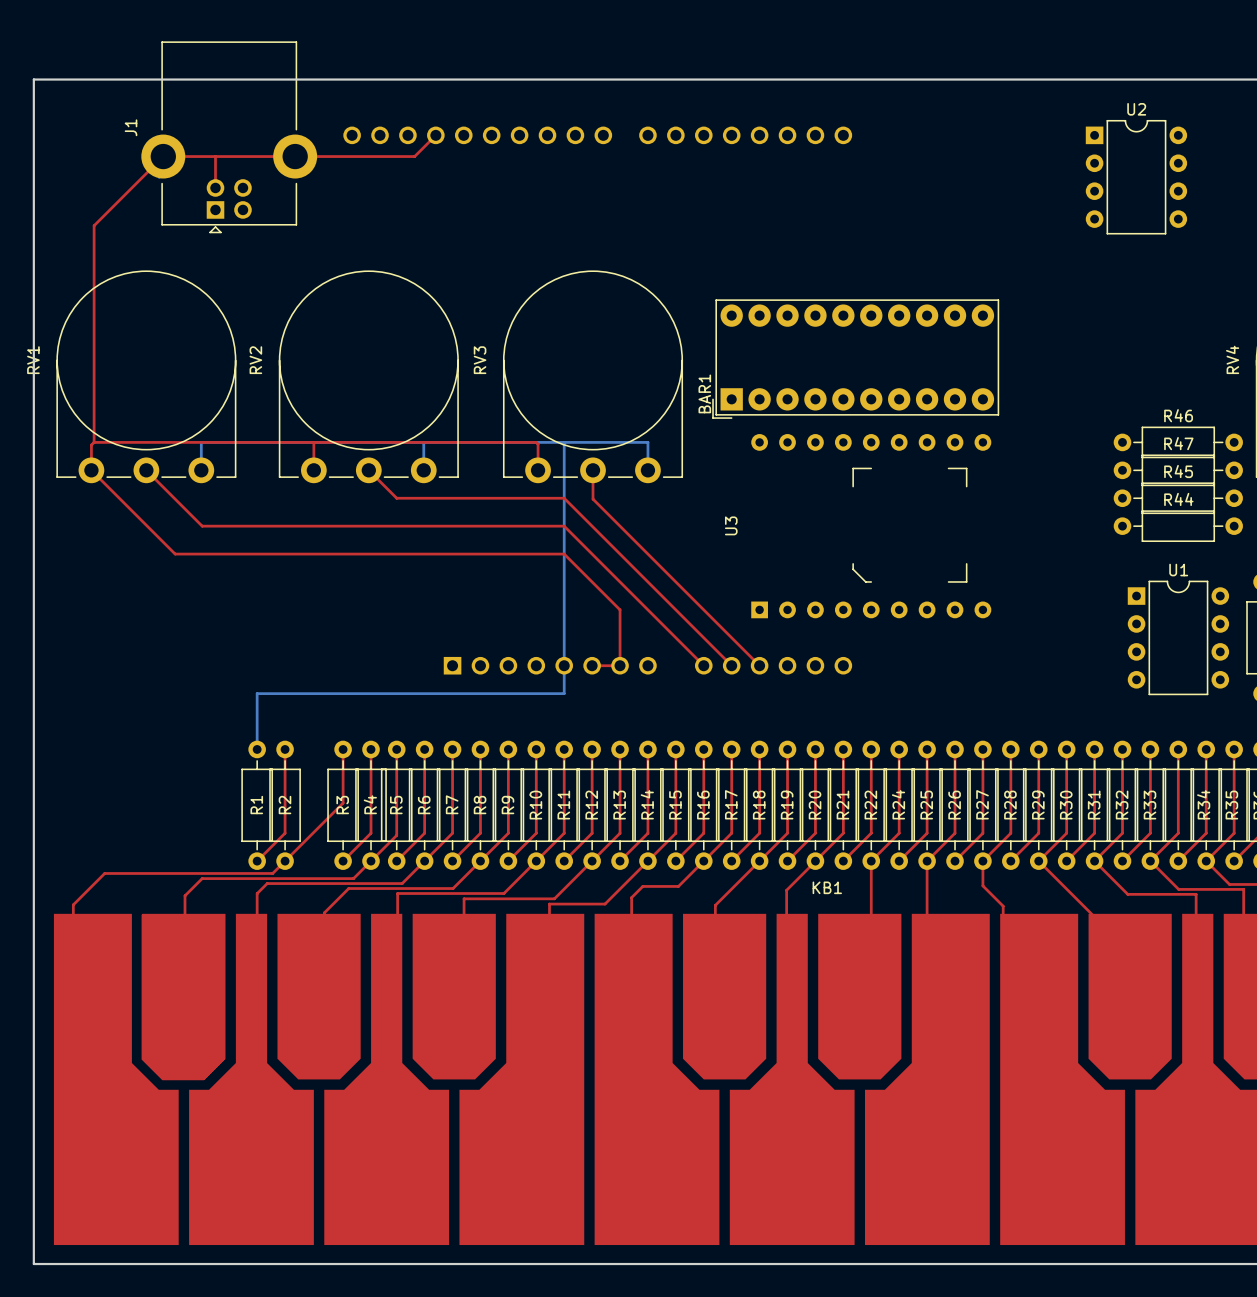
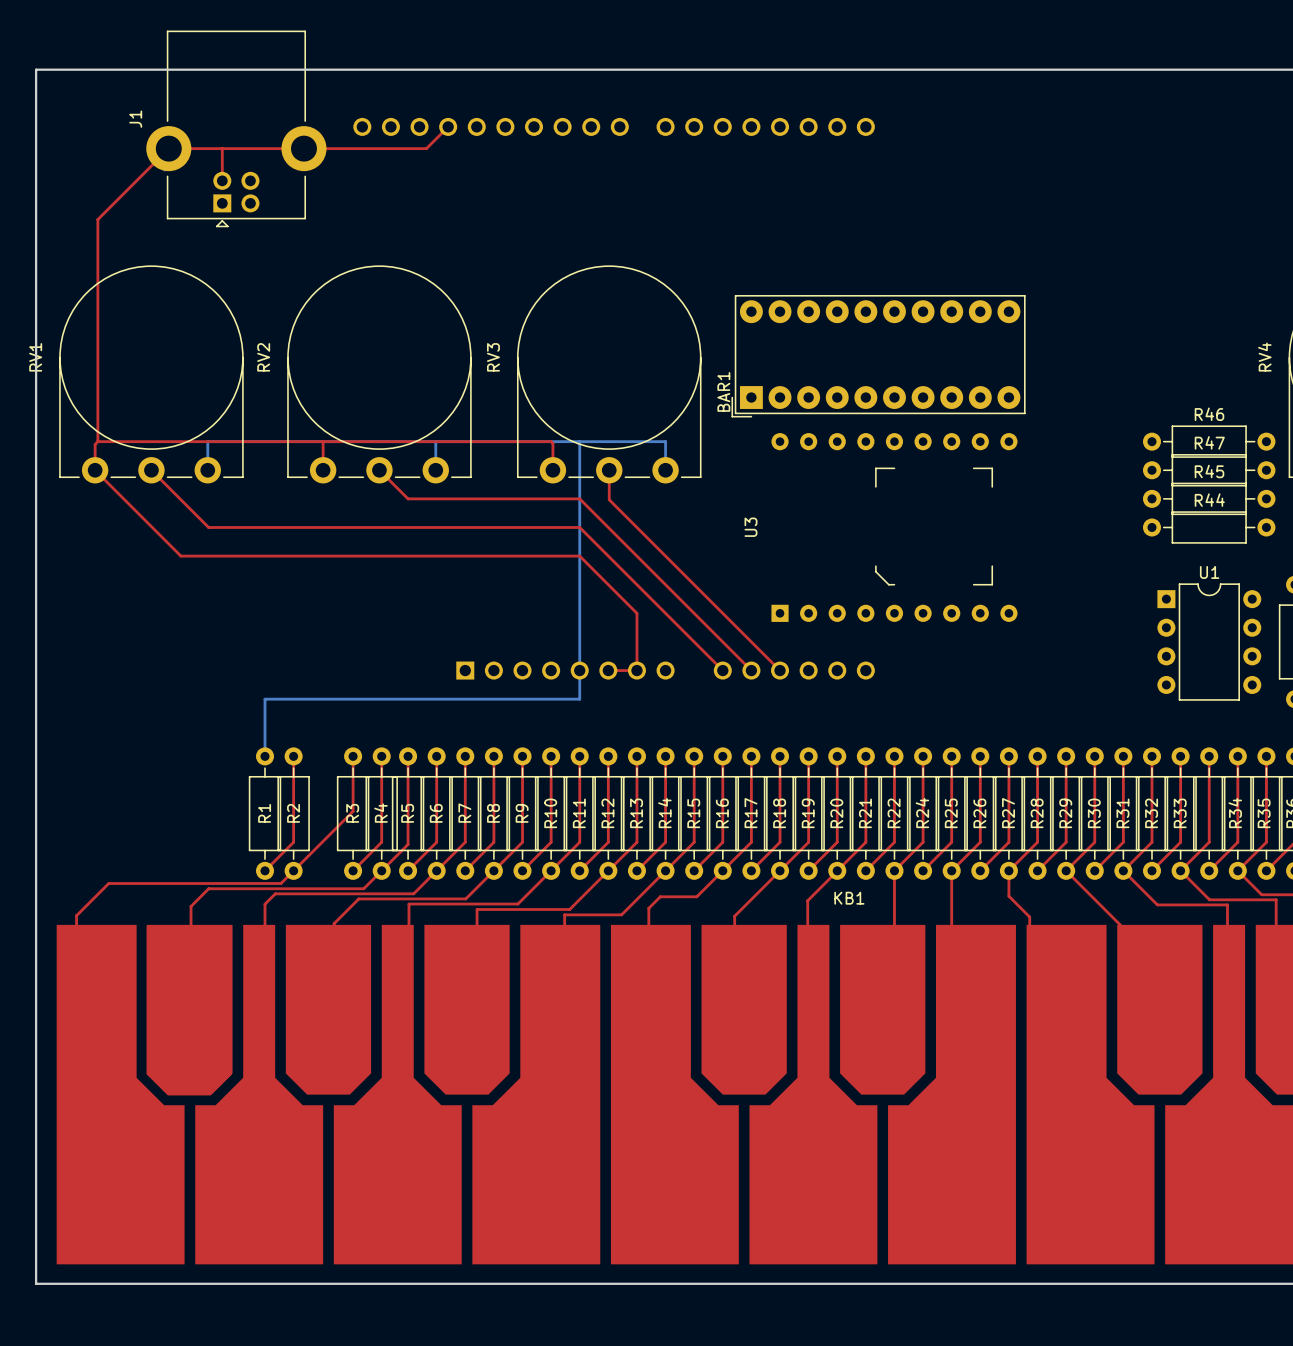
U2: (1136, 177) -> none

